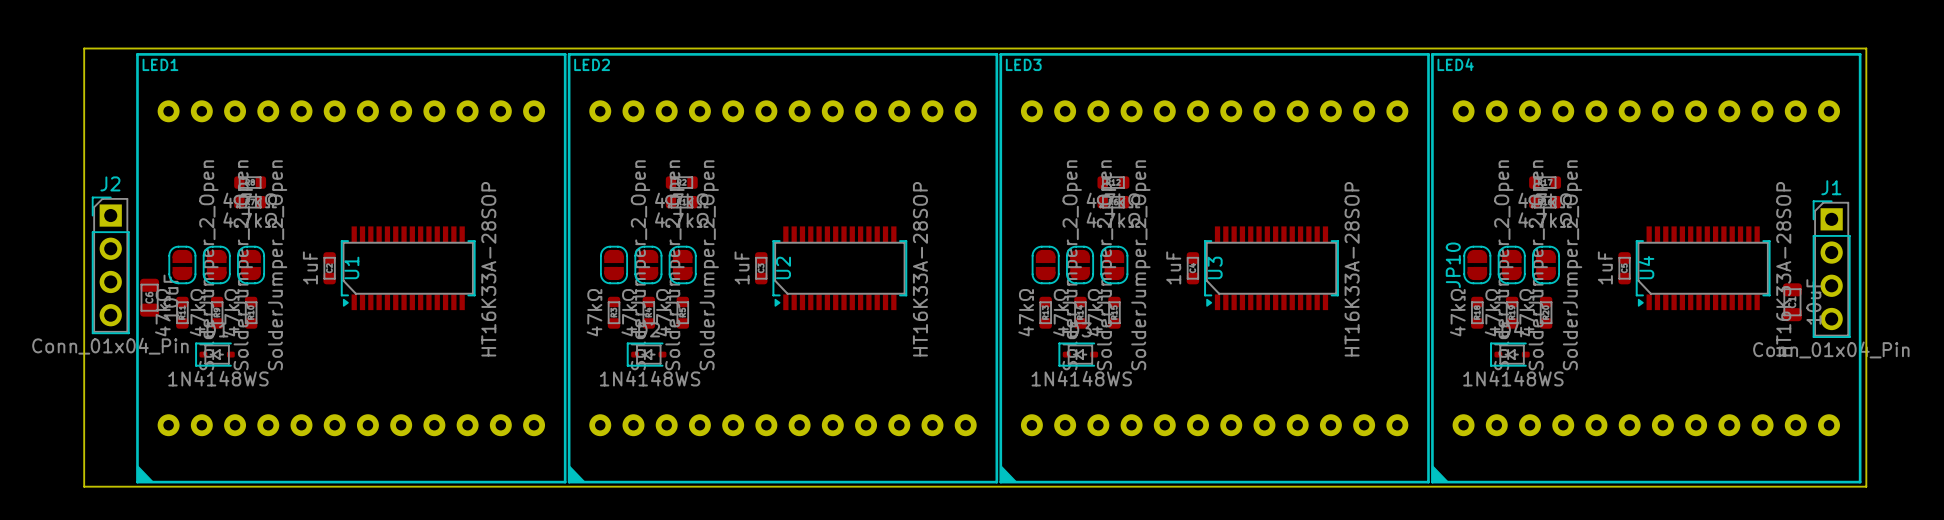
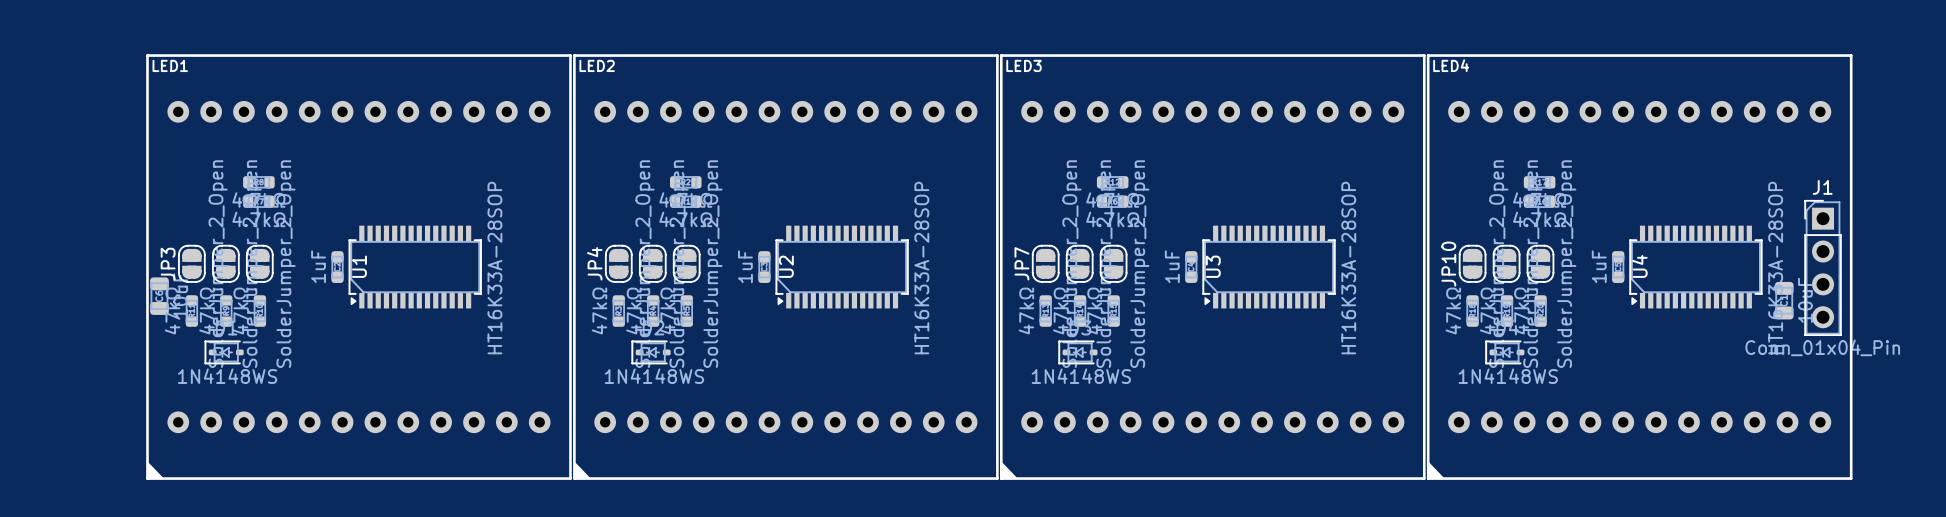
board edge: (84, 48) (1866, 48) (1866, 486) (84, 486) (84, 48) -> none
JP4 name: none -> JP4 (594, 263)
JP7 name: none -> JP7 (1021, 263)
J2: Conn_01x04_Pin (110, 265) -> none
JP3 name: none -> JP3 (168, 264)

